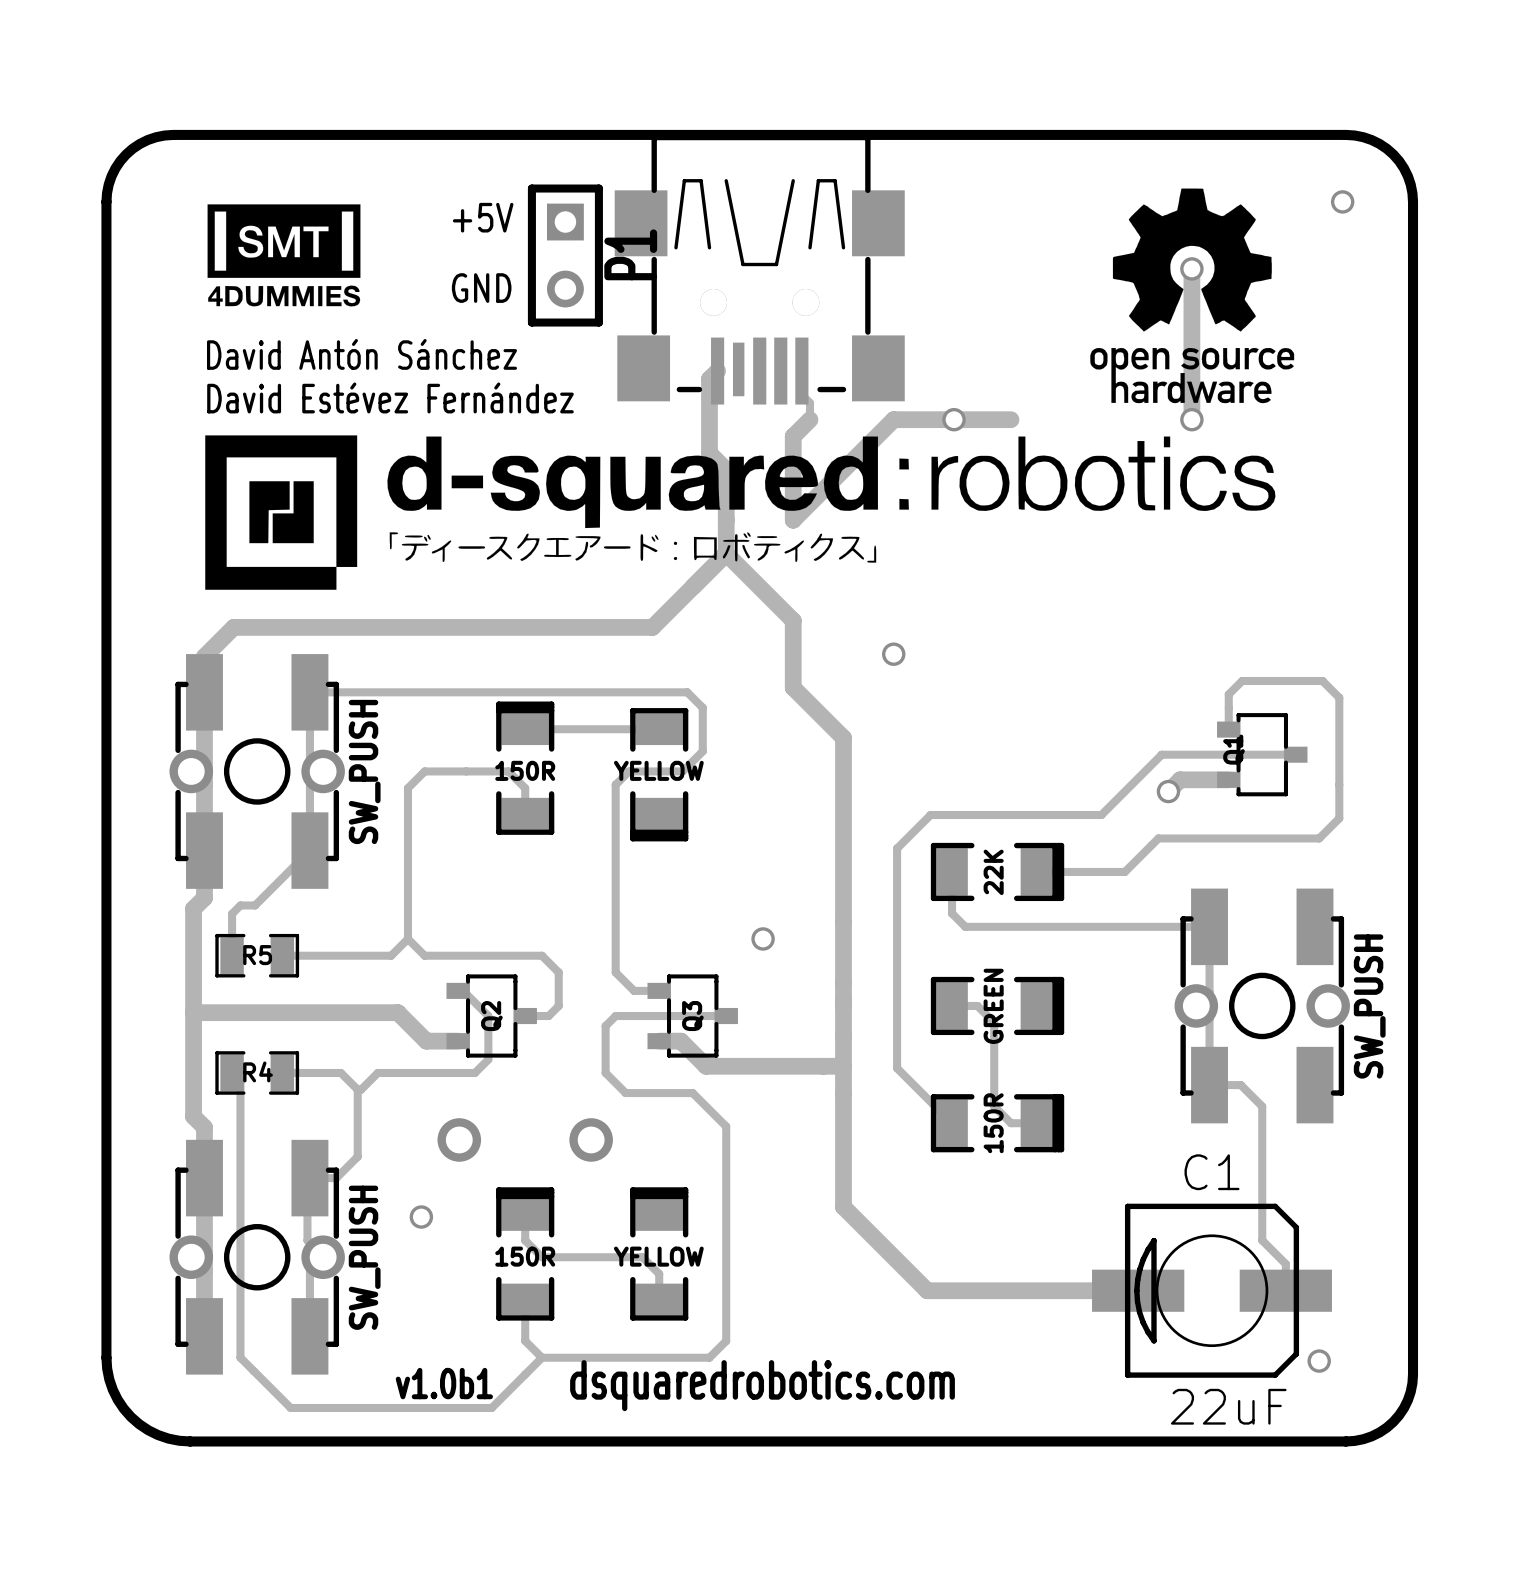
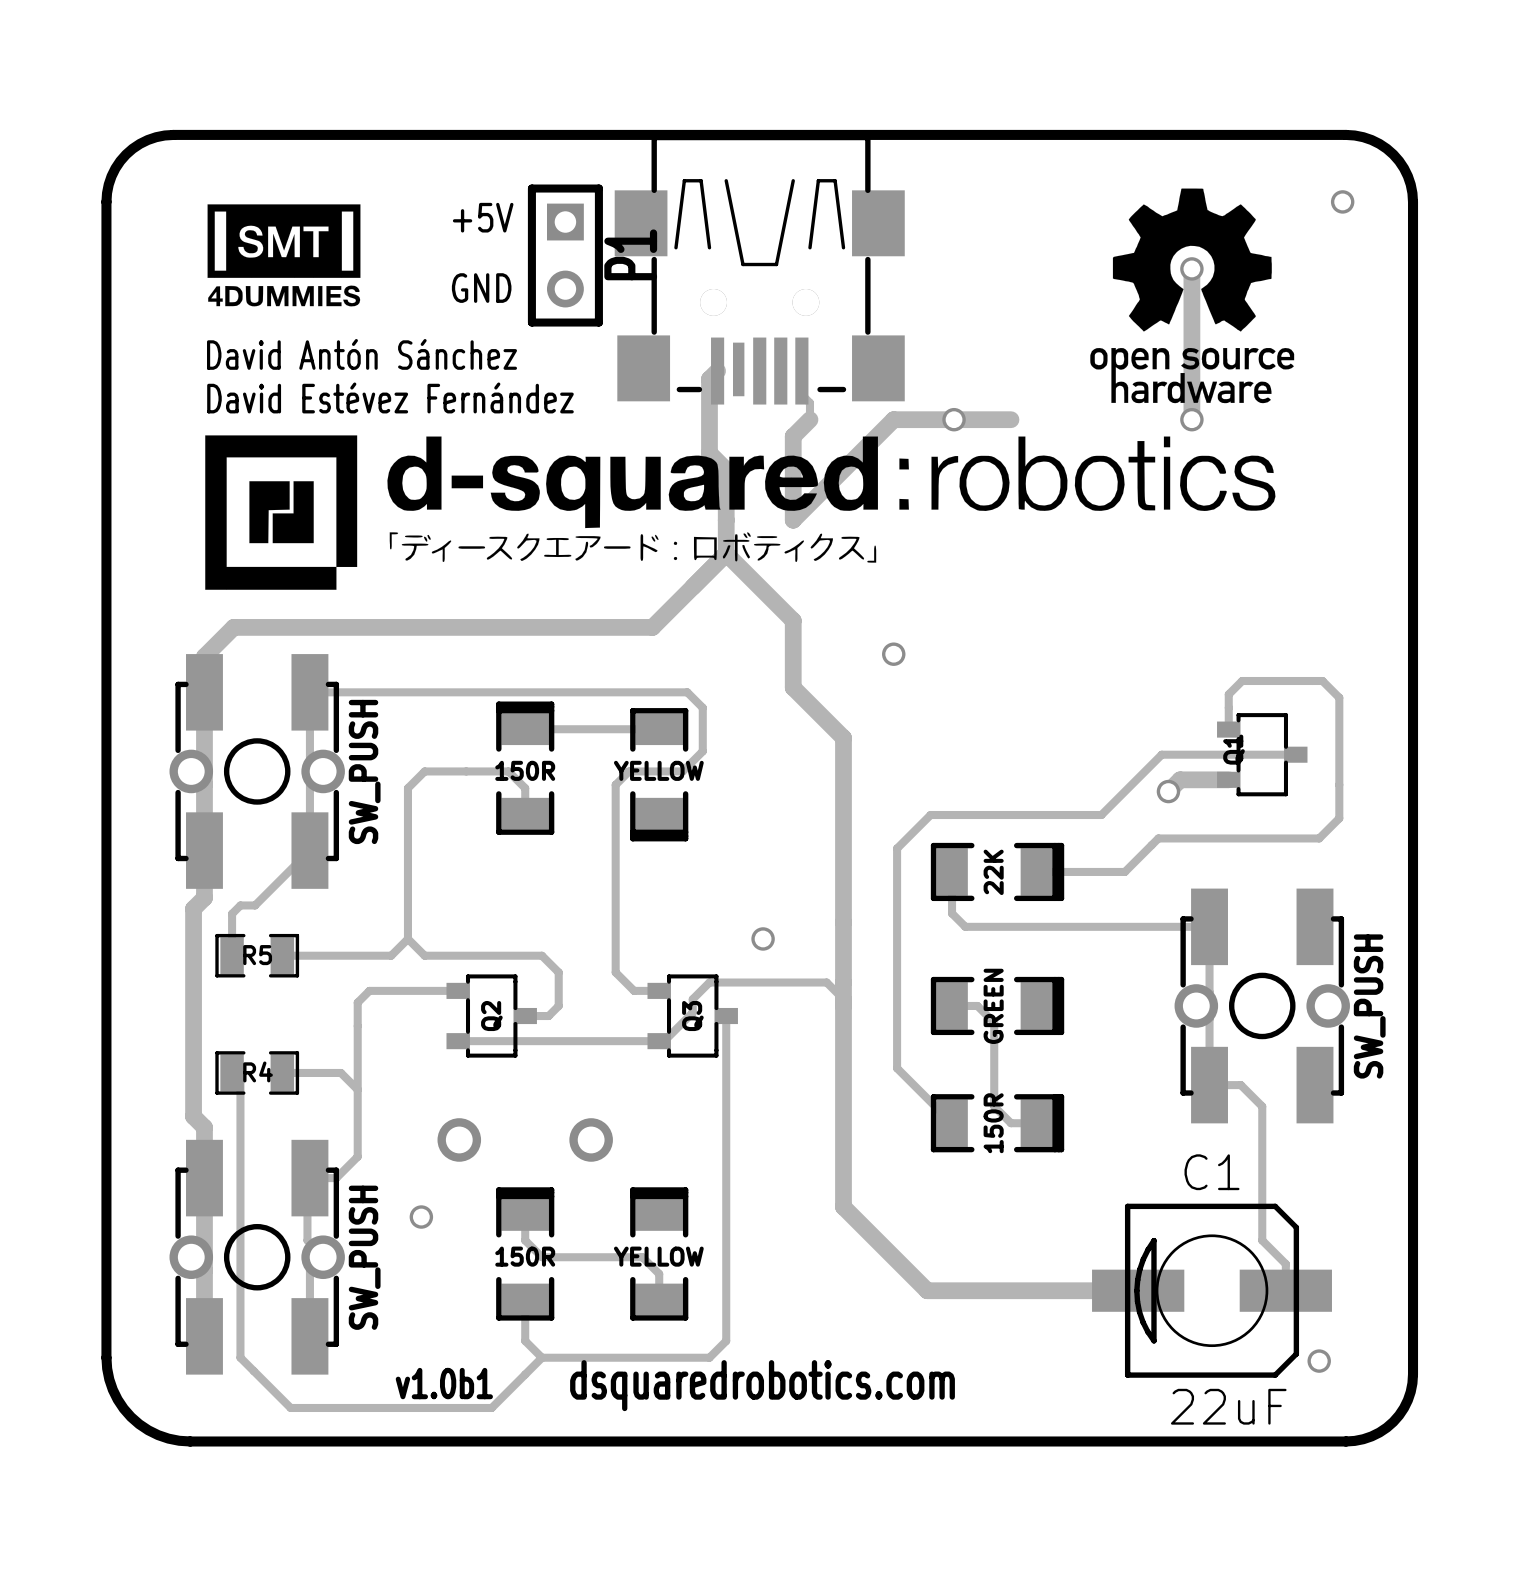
track: (458, 990) (463, 990) (488, 1016) (488, 1059) (474, 1072) (377, 1072) (361, 1089) (357, 1089) -> (458, 990) (369, 990) (357, 1002) (357, 1089)
track: (193, 1012) (397, 1012) (426, 1041) (458, 1041) -> (659, 1041) (458, 1041)
track: (726, 1016) (615, 1016) (605, 1026) (605, 1072) (625, 1093) (692, 1093) (726, 1126) -> (726, 1016) (726, 1126)
track: (664, 1041) (681, 1041) (706, 1066) (843, 1066) -> (664, 1041) (692, 1012) (692, 999) (709, 982) (826, 982) (843, 999)

